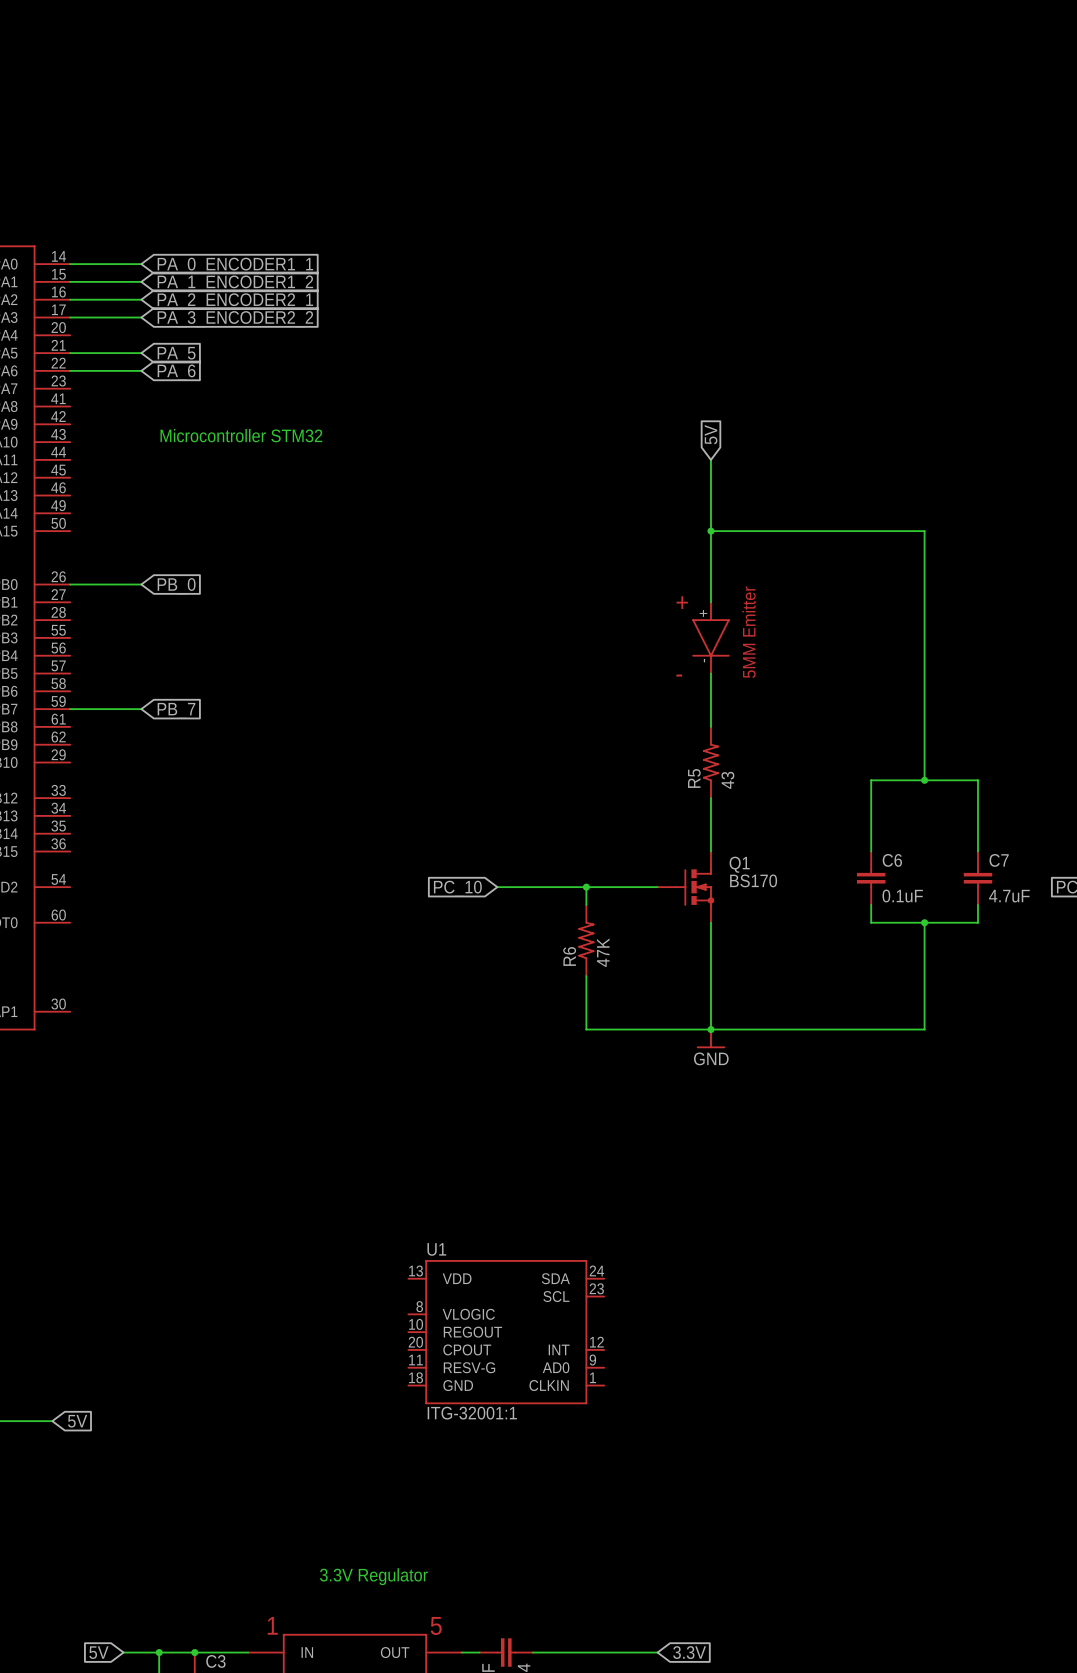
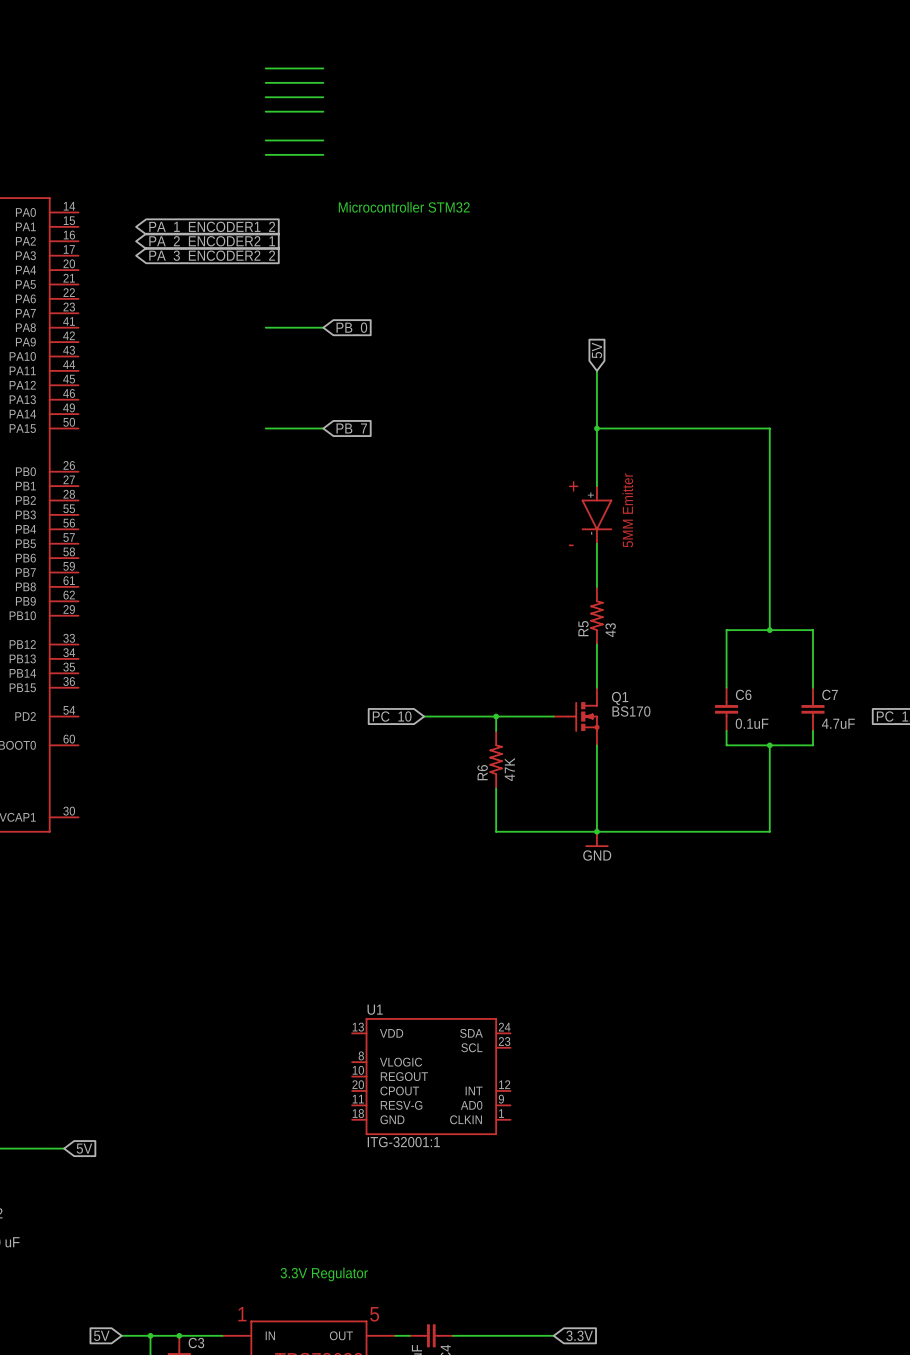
wire: none -> (265, 68) (323, 68)
wire: none -> (265, 82) (323, 82)
wire: none -> (265, 97) (323, 97)
wire: none -> (265, 111) (323, 111)
wire: none -> (265, 140) (323, 140)
wire: none -> (265, 154) (323, 154)
text: none -> Microcontroller STM32 (404, 207)
wire: (70, 264) (141, 264) -> none
global label: PA_0_ENCODER1_1 (235, 265) -> none
wire: (70, 281) (141, 281) -> none
wire: (70, 299) (141, 299) -> none
wire: (70, 317) (141, 317) -> none
wire: (70, 353) (141, 353) -> none
global label: PA_5 (176, 354) -> none
wire: (70, 370) (141, 370) -> none
global label: PA_6 (176, 372) -> none
wire: none -> (265, 327) (323, 327)
global label: none -> PB_0 (351, 329)
text: Microcontroller STM32 (241, 435) -> none
wire: none -> (265, 428) (323, 428)
global label: none -> PB_7 (351, 429)
wire: (70, 584) (141, 584) -> none
global label: PB_0 (176, 586) -> none
wire: (70, 709) (141, 709) -> none
global label: PB_7 (176, 710) -> none

